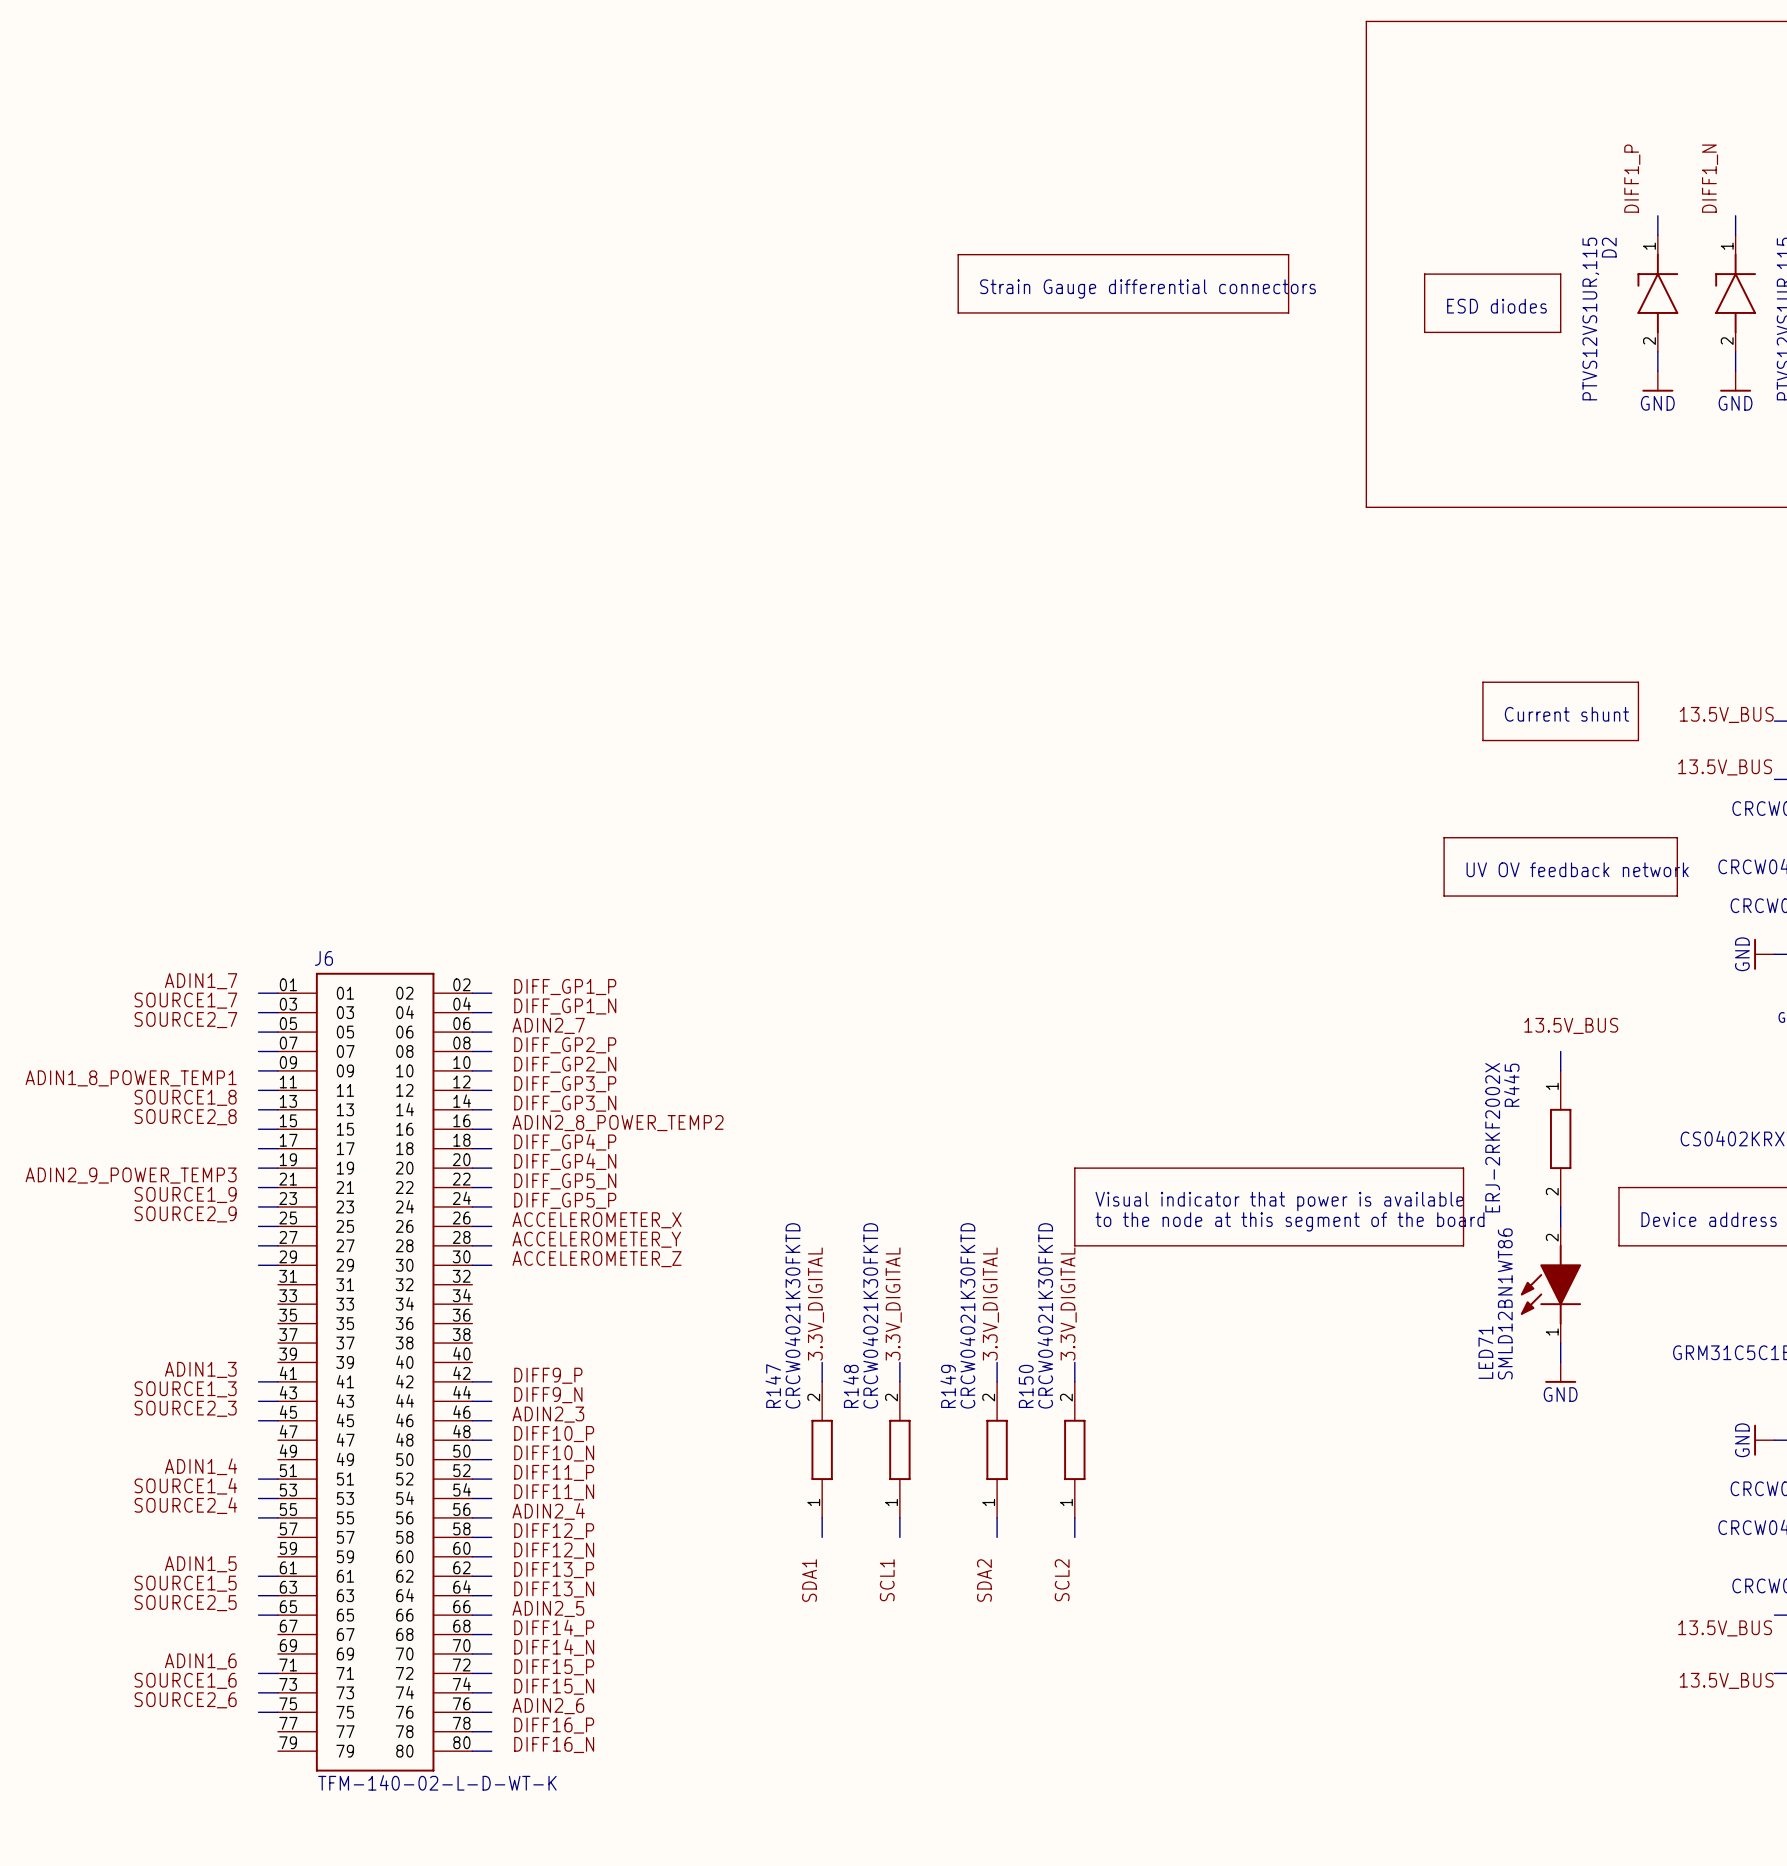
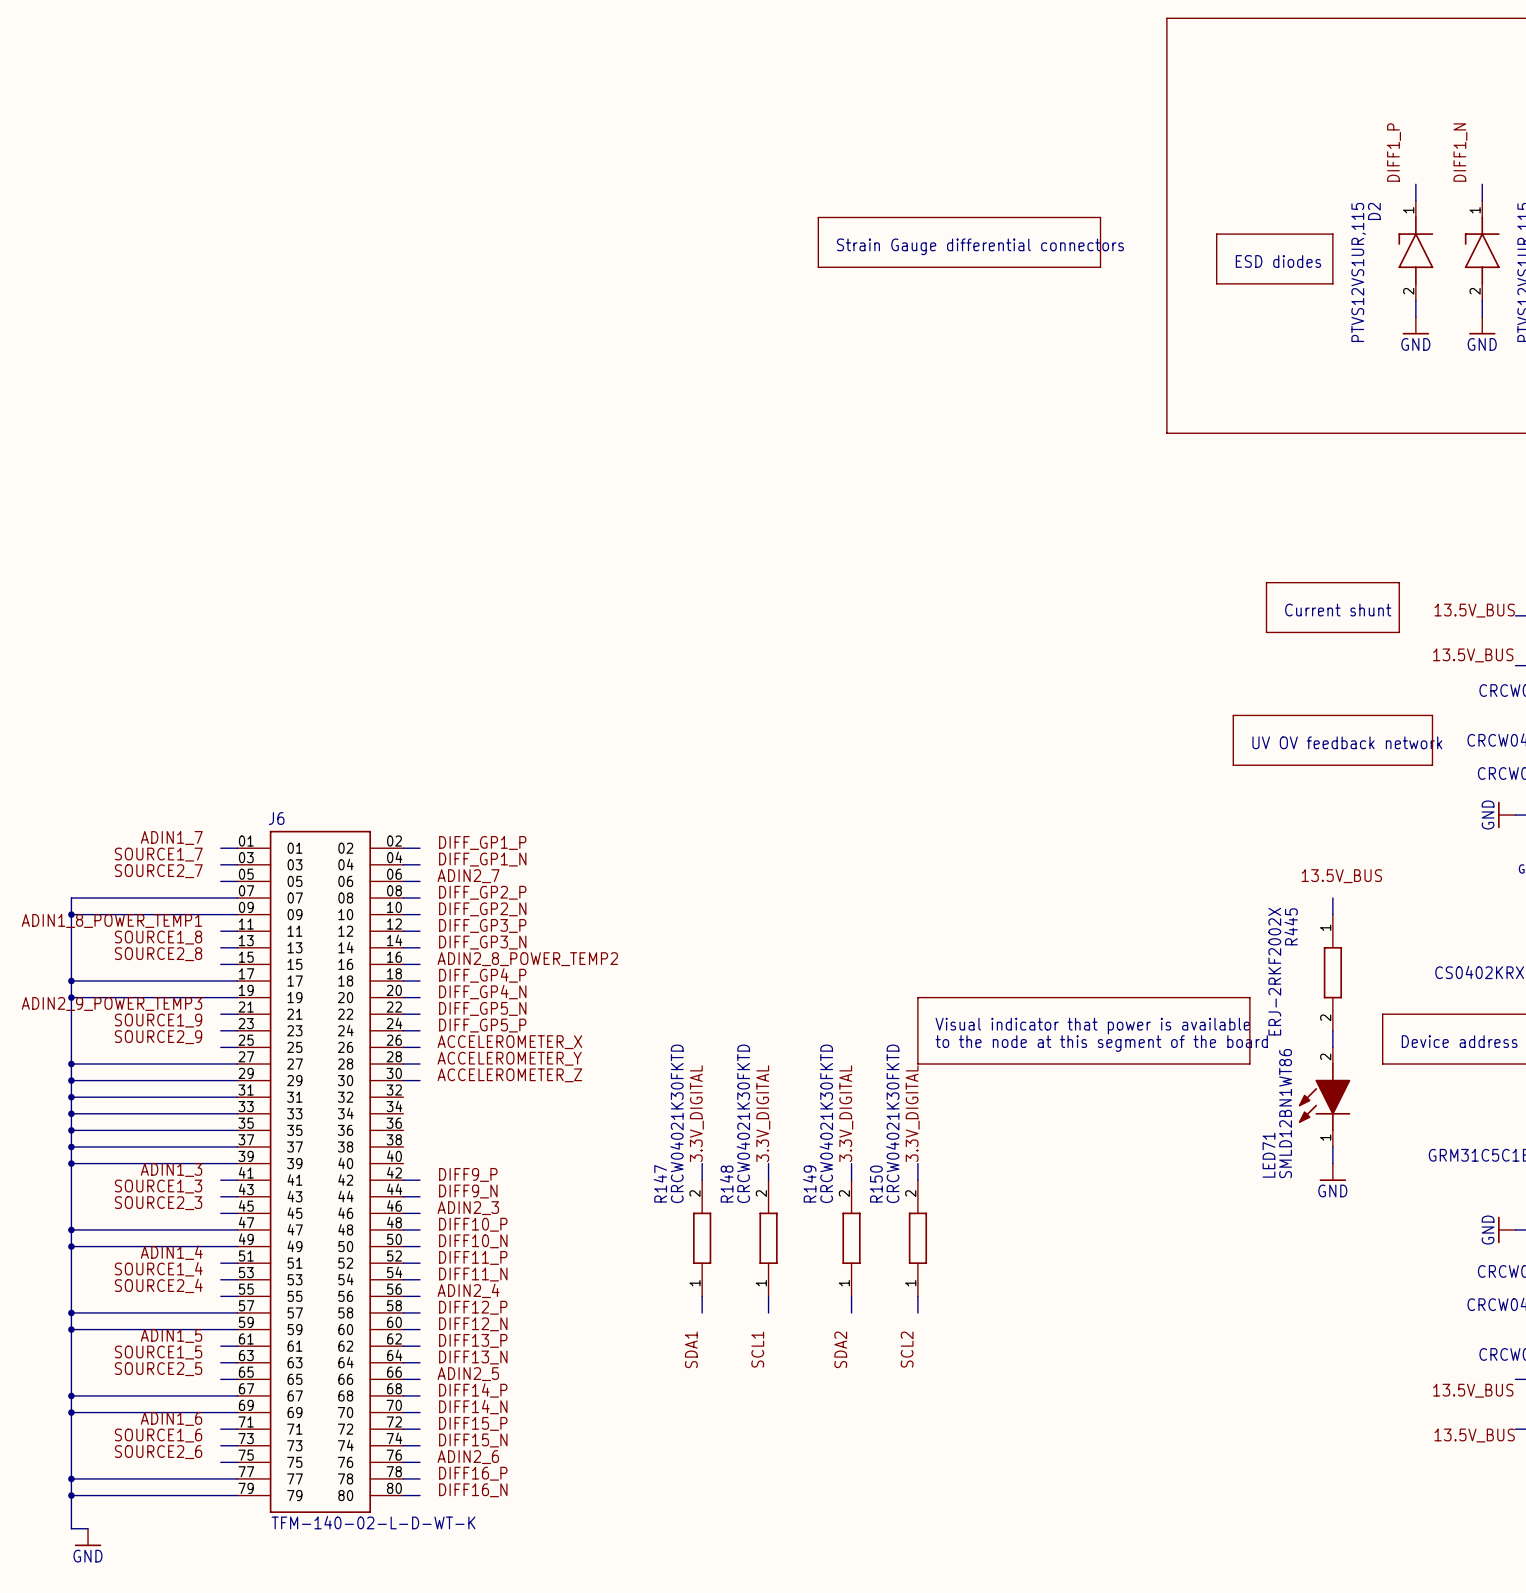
wire: none -> (220, 898) (71, 898) (71, 1528) (88, 1528)
wire: none -> (71, 914) (220, 914)
junction: none -> (71, 914)
wire: none -> (71, 981) (220, 981)
junction: none -> (71, 981)
wire: none -> (71, 997) (220, 997)
junction: none -> (71, 997)
wire: none -> (71, 1064) (220, 1064)
junction: none -> (71, 1064)
wire: none -> (71, 1080) (220, 1080)
junction: none -> (71, 1080)
wire: none -> (71, 1097) (237, 1097)
junction: none -> (71, 1097)
wire: none -> (71, 1113) (237, 1113)
junction: none -> (71, 1113)
wire: none -> (71, 1130) (237, 1130)
junction: none -> (71, 1130)
wire: none -> (71, 1146) (237, 1146)
junction: none -> (71, 1146)
wire: none -> (71, 1163) (237, 1163)
junction: none -> (71, 1163)
wire: none -> (71, 1229) (237, 1229)
junction: none -> (71, 1229)
wire: none -> (71, 1246) (237, 1246)
junction: none -> (71, 1246)
wire: none -> (71, 1312) (237, 1312)
junction: none -> (71, 1312)
wire: none -> (71, 1329) (237, 1329)
junction: none -> (71, 1329)
wire: none -> (71, 1395) (237, 1395)
junction: none -> (71, 1395)
wire: none -> (71, 1412) (237, 1412)
junction: none -> (71, 1412)
wire: none -> (71, 1478) (237, 1478)
junction: none -> (71, 1478)
wire: none -> (71, 1495) (237, 1495)
junction: none -> (71, 1495)
power symbol: none -> GND (88, 1537)

